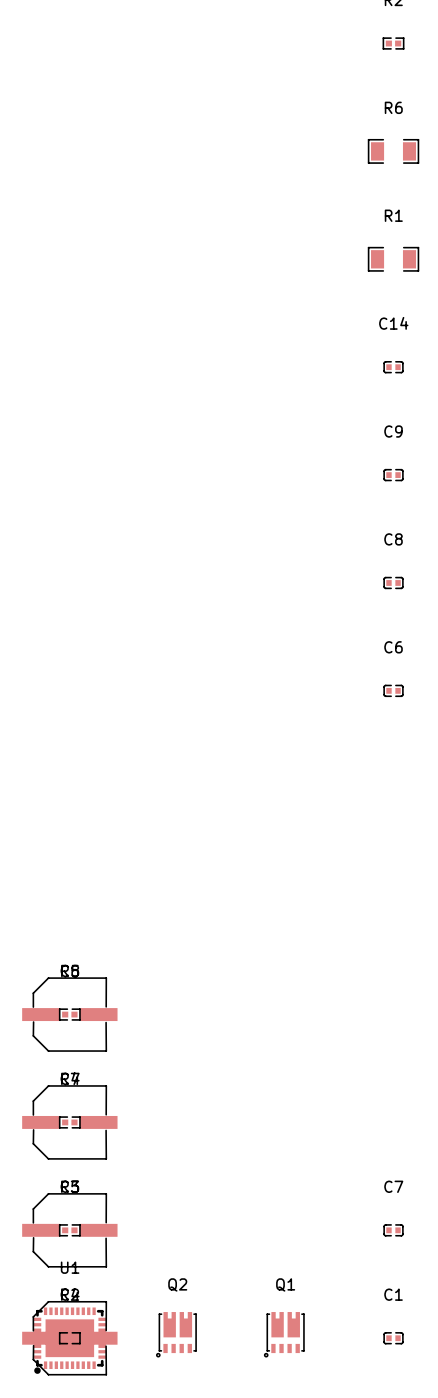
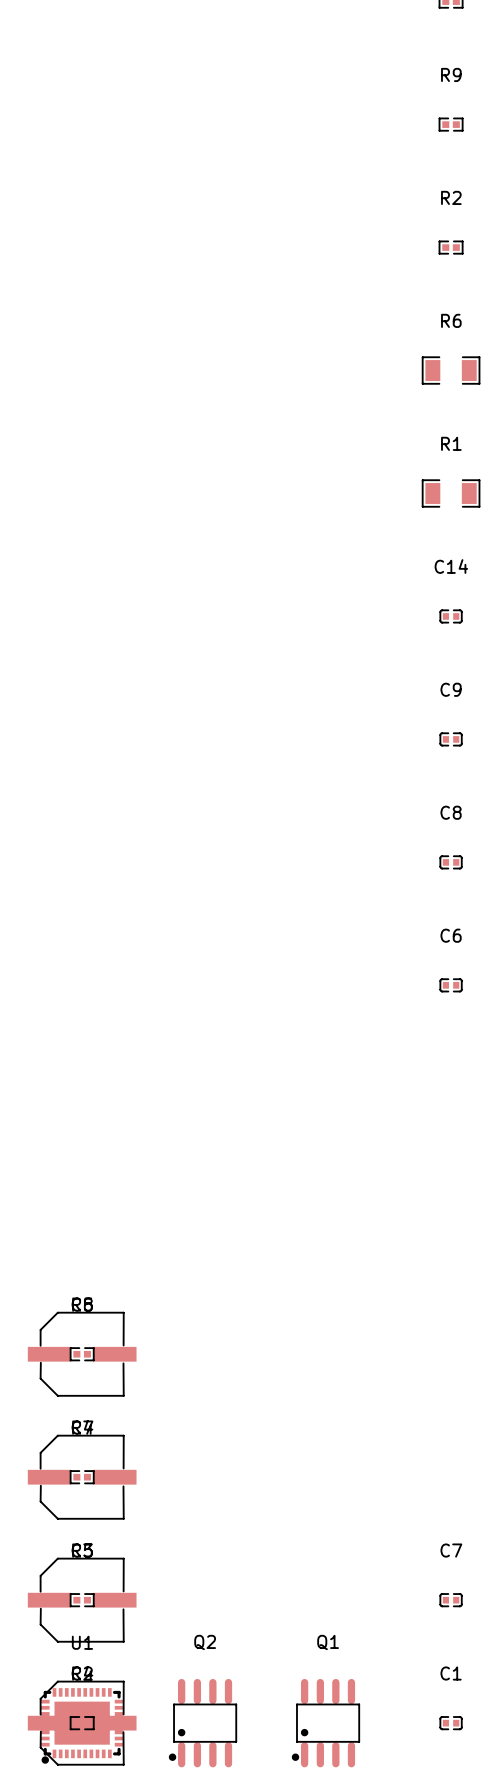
Q2 footprint: [155, 1312, 197, 1358] -> [168, 1678, 238, 1768]
Q1 footprint: [263, 1312, 305, 1358] -> [291, 1678, 361, 1768]

